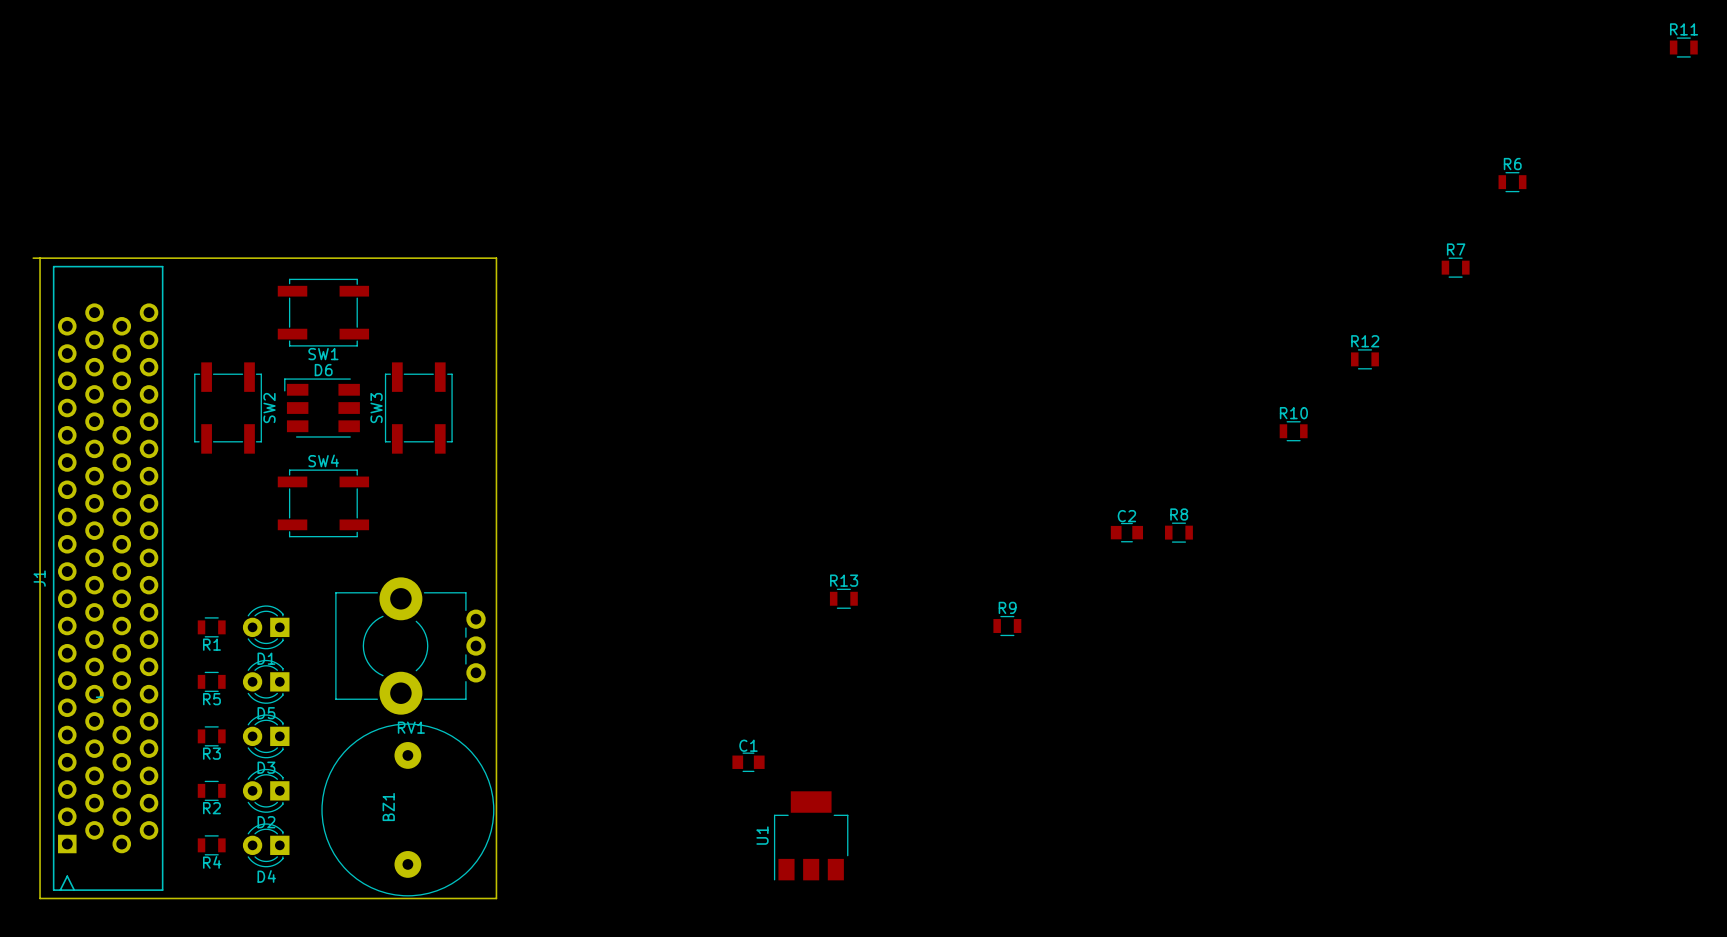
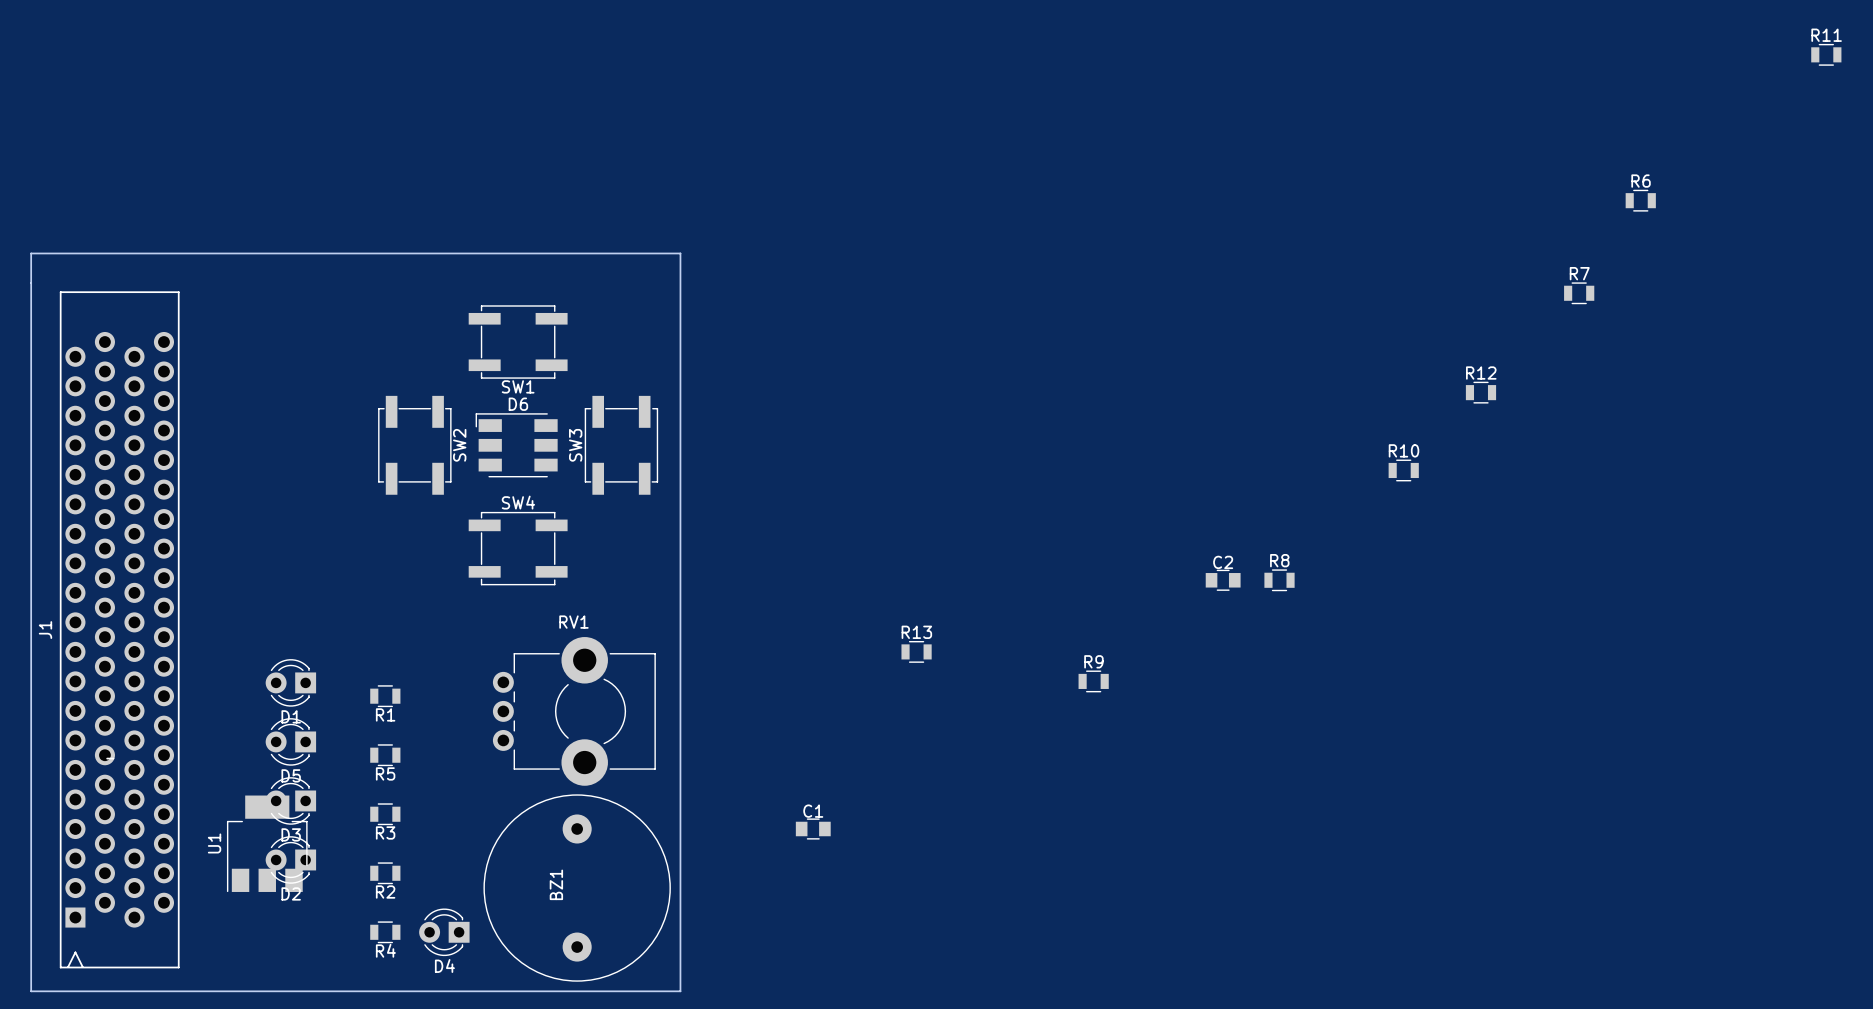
board edge: none -> (31, 253) (31, 991) (680, 991) (680, 253) (31, 253)
board edge: (33, 258) (496, 258) (496, 898) (40, 898) (40, 258) -> none
SW1 position: (323, 312) -> (518, 342)
SW2 position: (228, 408) -> (414, 445)
D6 position: (322, 408) -> (516, 445)
SW3 position: (418, 408) -> (621, 445)
SW4 position: (323, 503) -> (518, 548)
R1 position: (211, 627) -> (385, 696)
RV1 rotation: 0° (410, 646) -> 180° (574, 711)
RV1 position: (410, 646) -> (574, 711)
R5 position: (211, 681) -> (385, 755)
R3 position: (211, 736) -> (385, 814)
R2 position: (211, 790) -> (385, 873)
BZ1 position: (407, 809) -> (577, 888)
D4 footprint: [242, 823, 290, 868] -> [419, 908, 470, 957]
U1 position: (811, 835) -> (267, 843)
R4 position: (211, 845) -> (385, 932)

